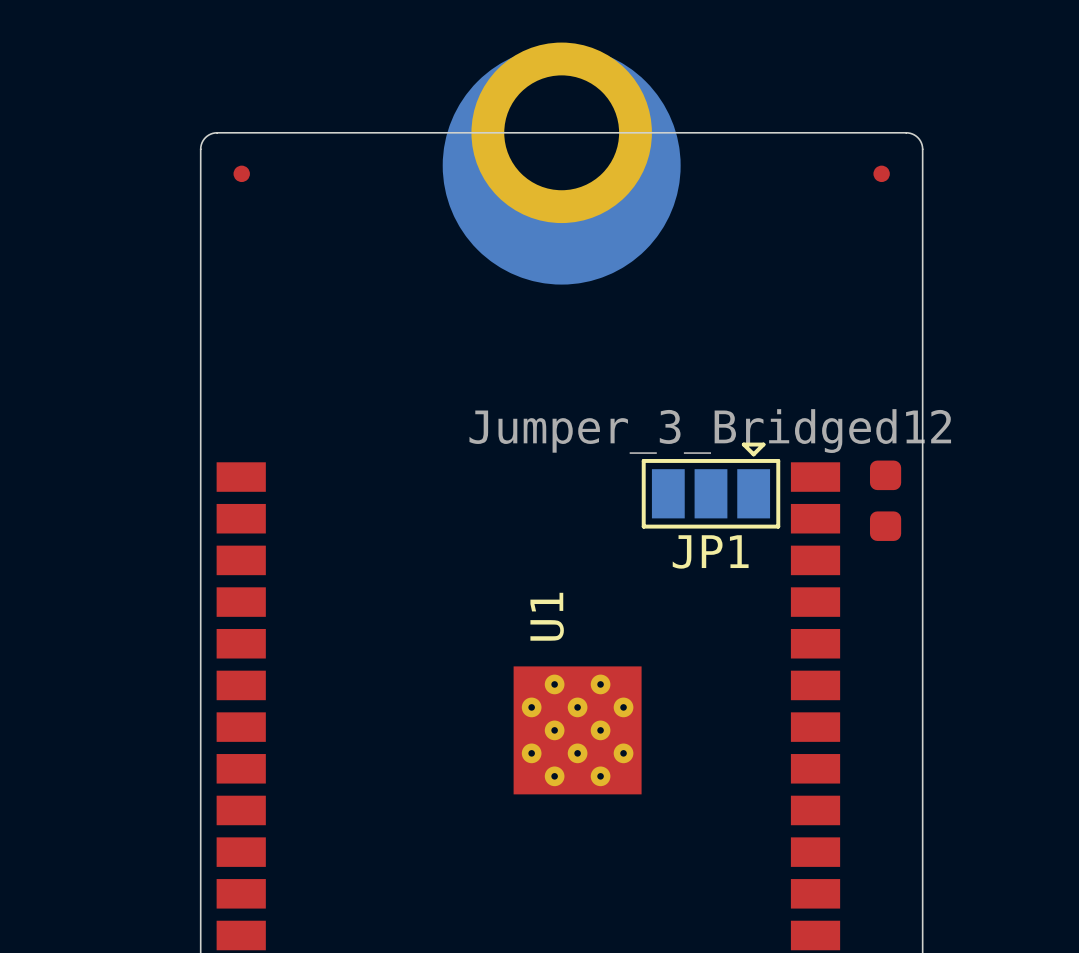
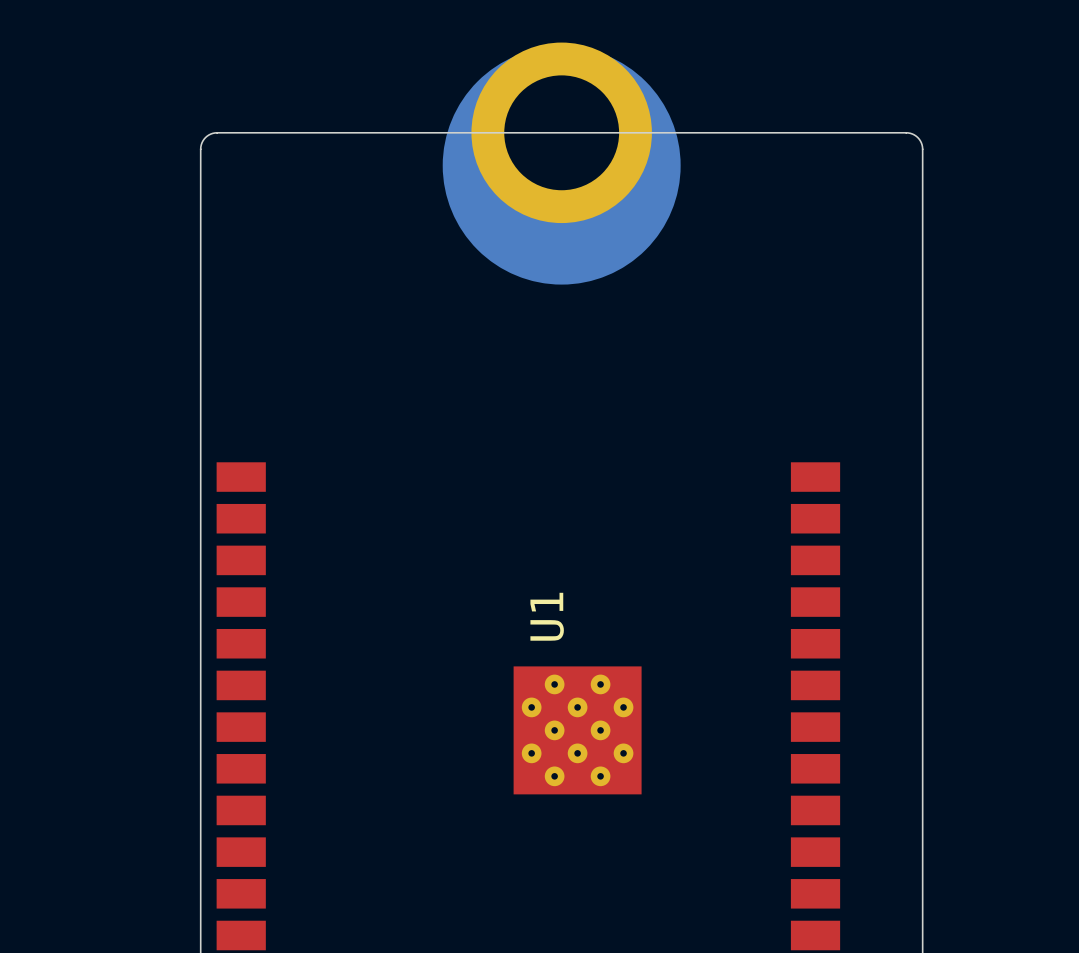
part: (241, 173) -> none
part: (881, 173) -> none
JP1: Jumper_3_Bridged12 (710, 485) -> none
part: (885, 500) -> none

